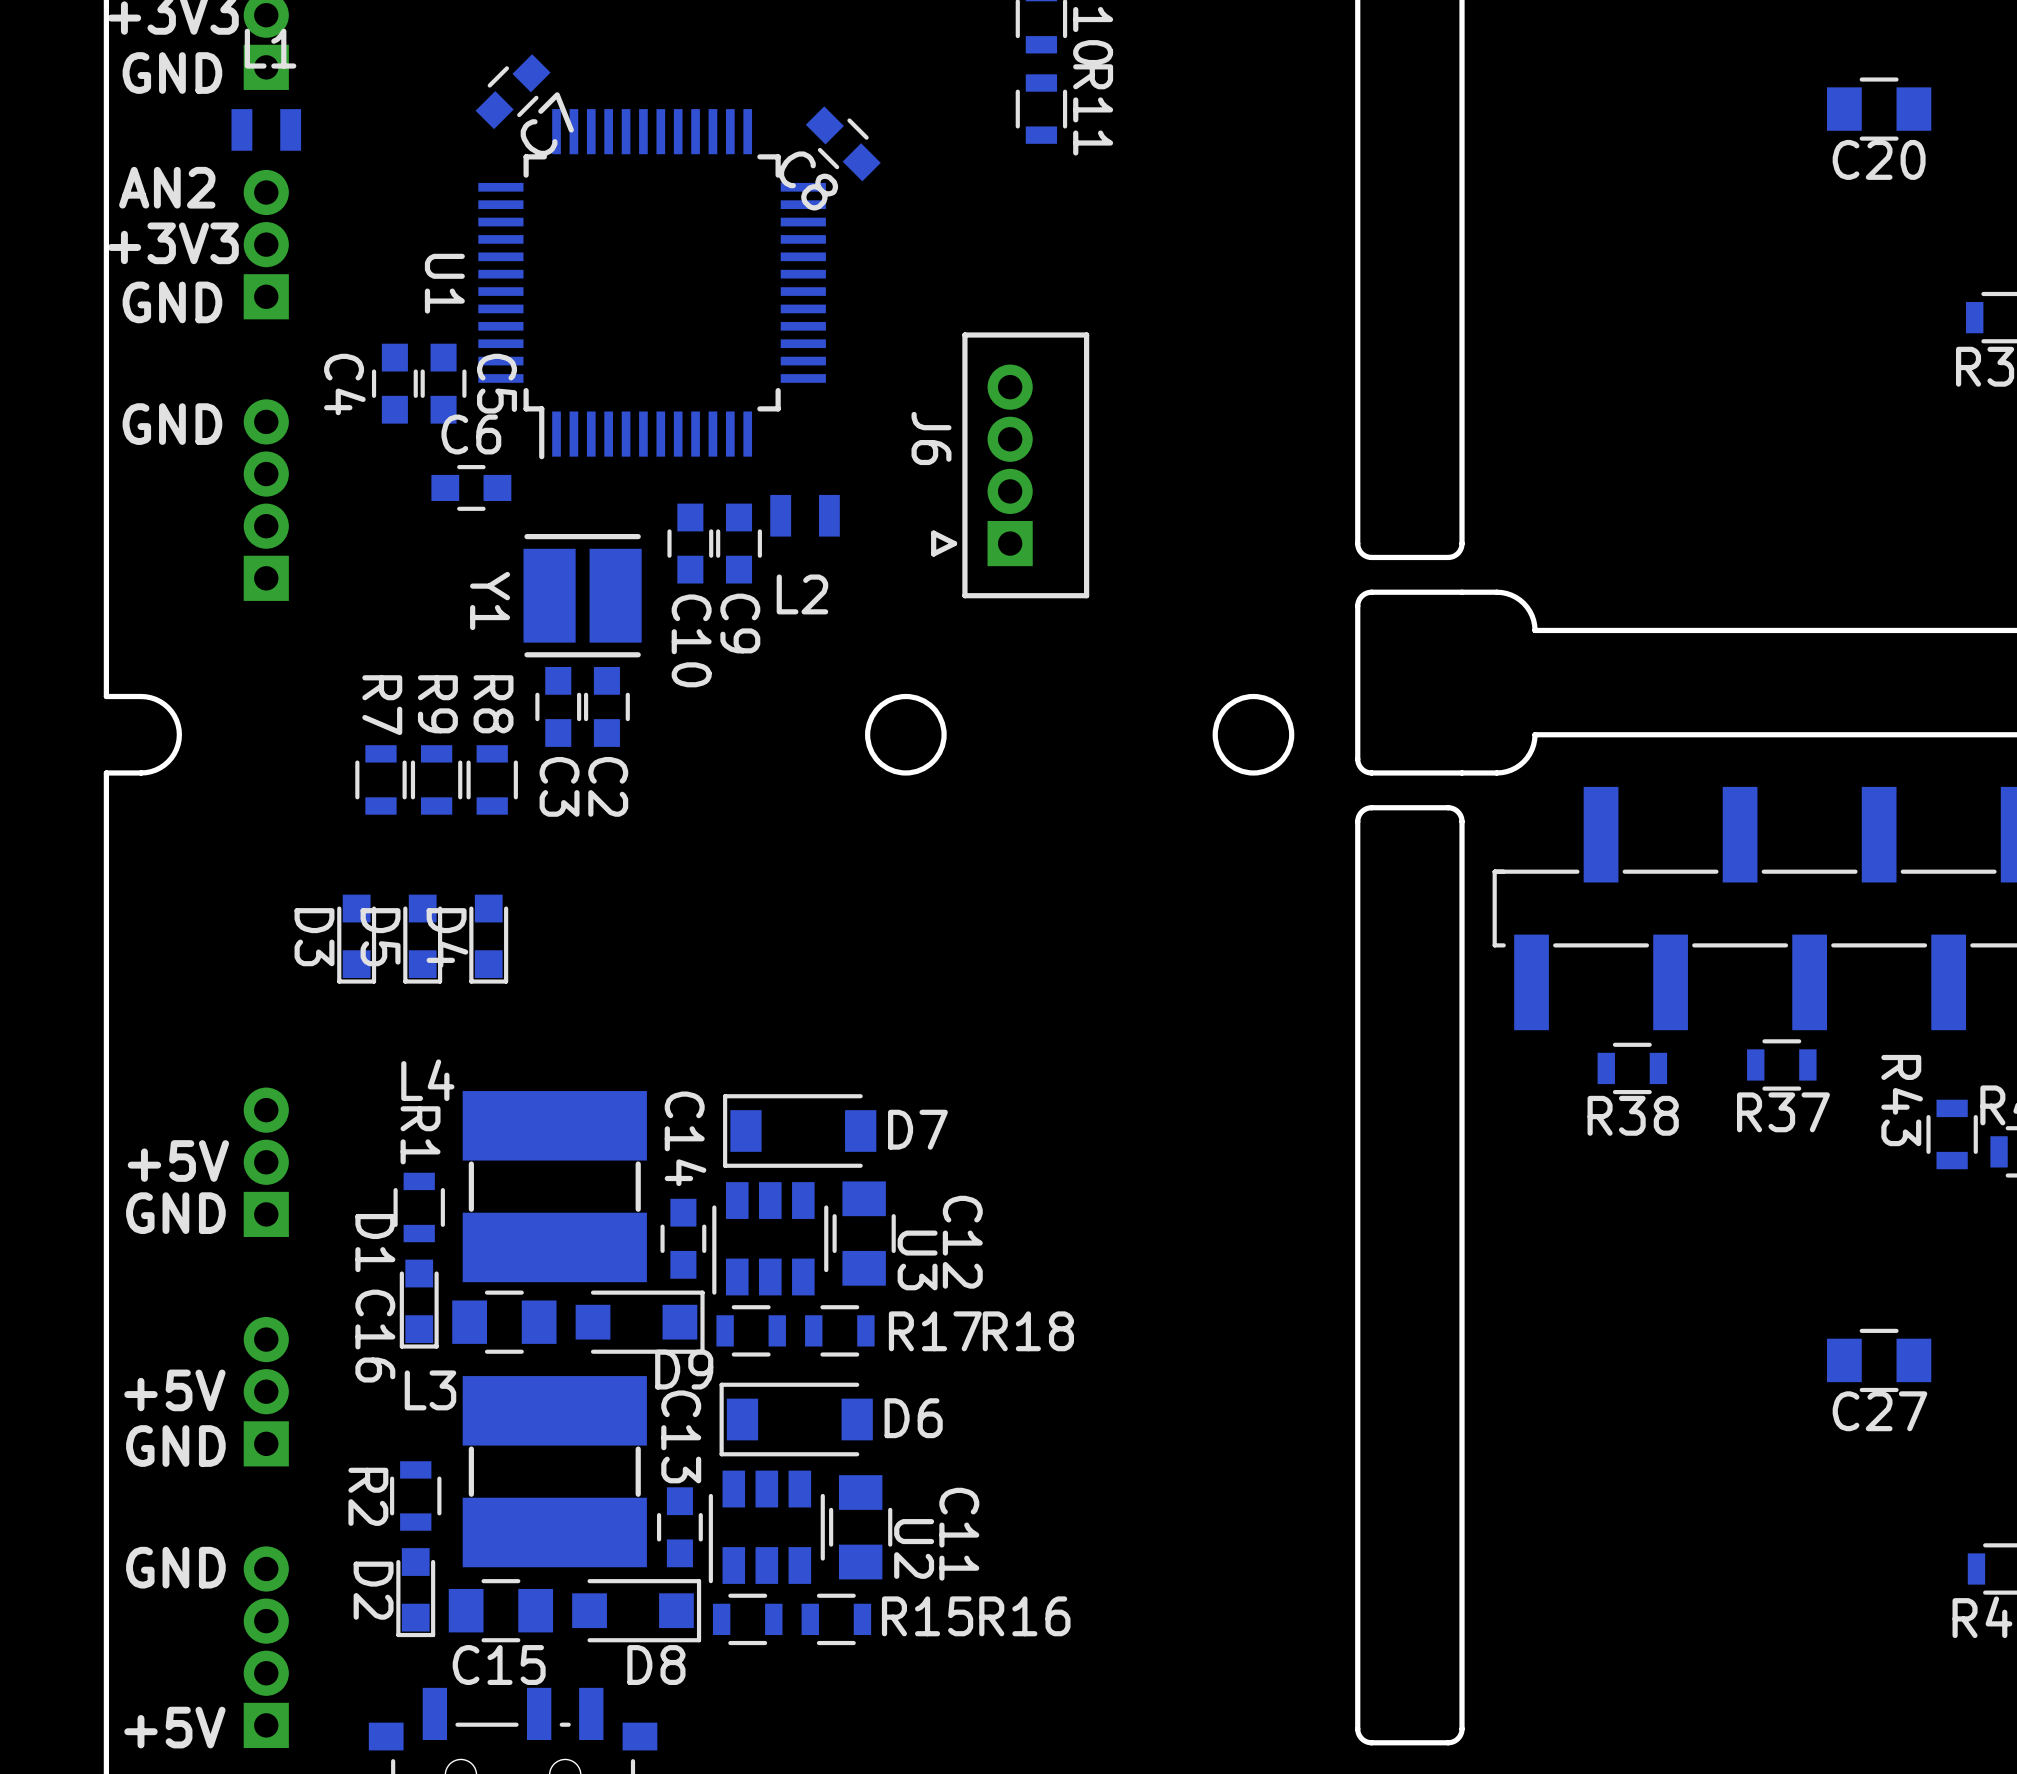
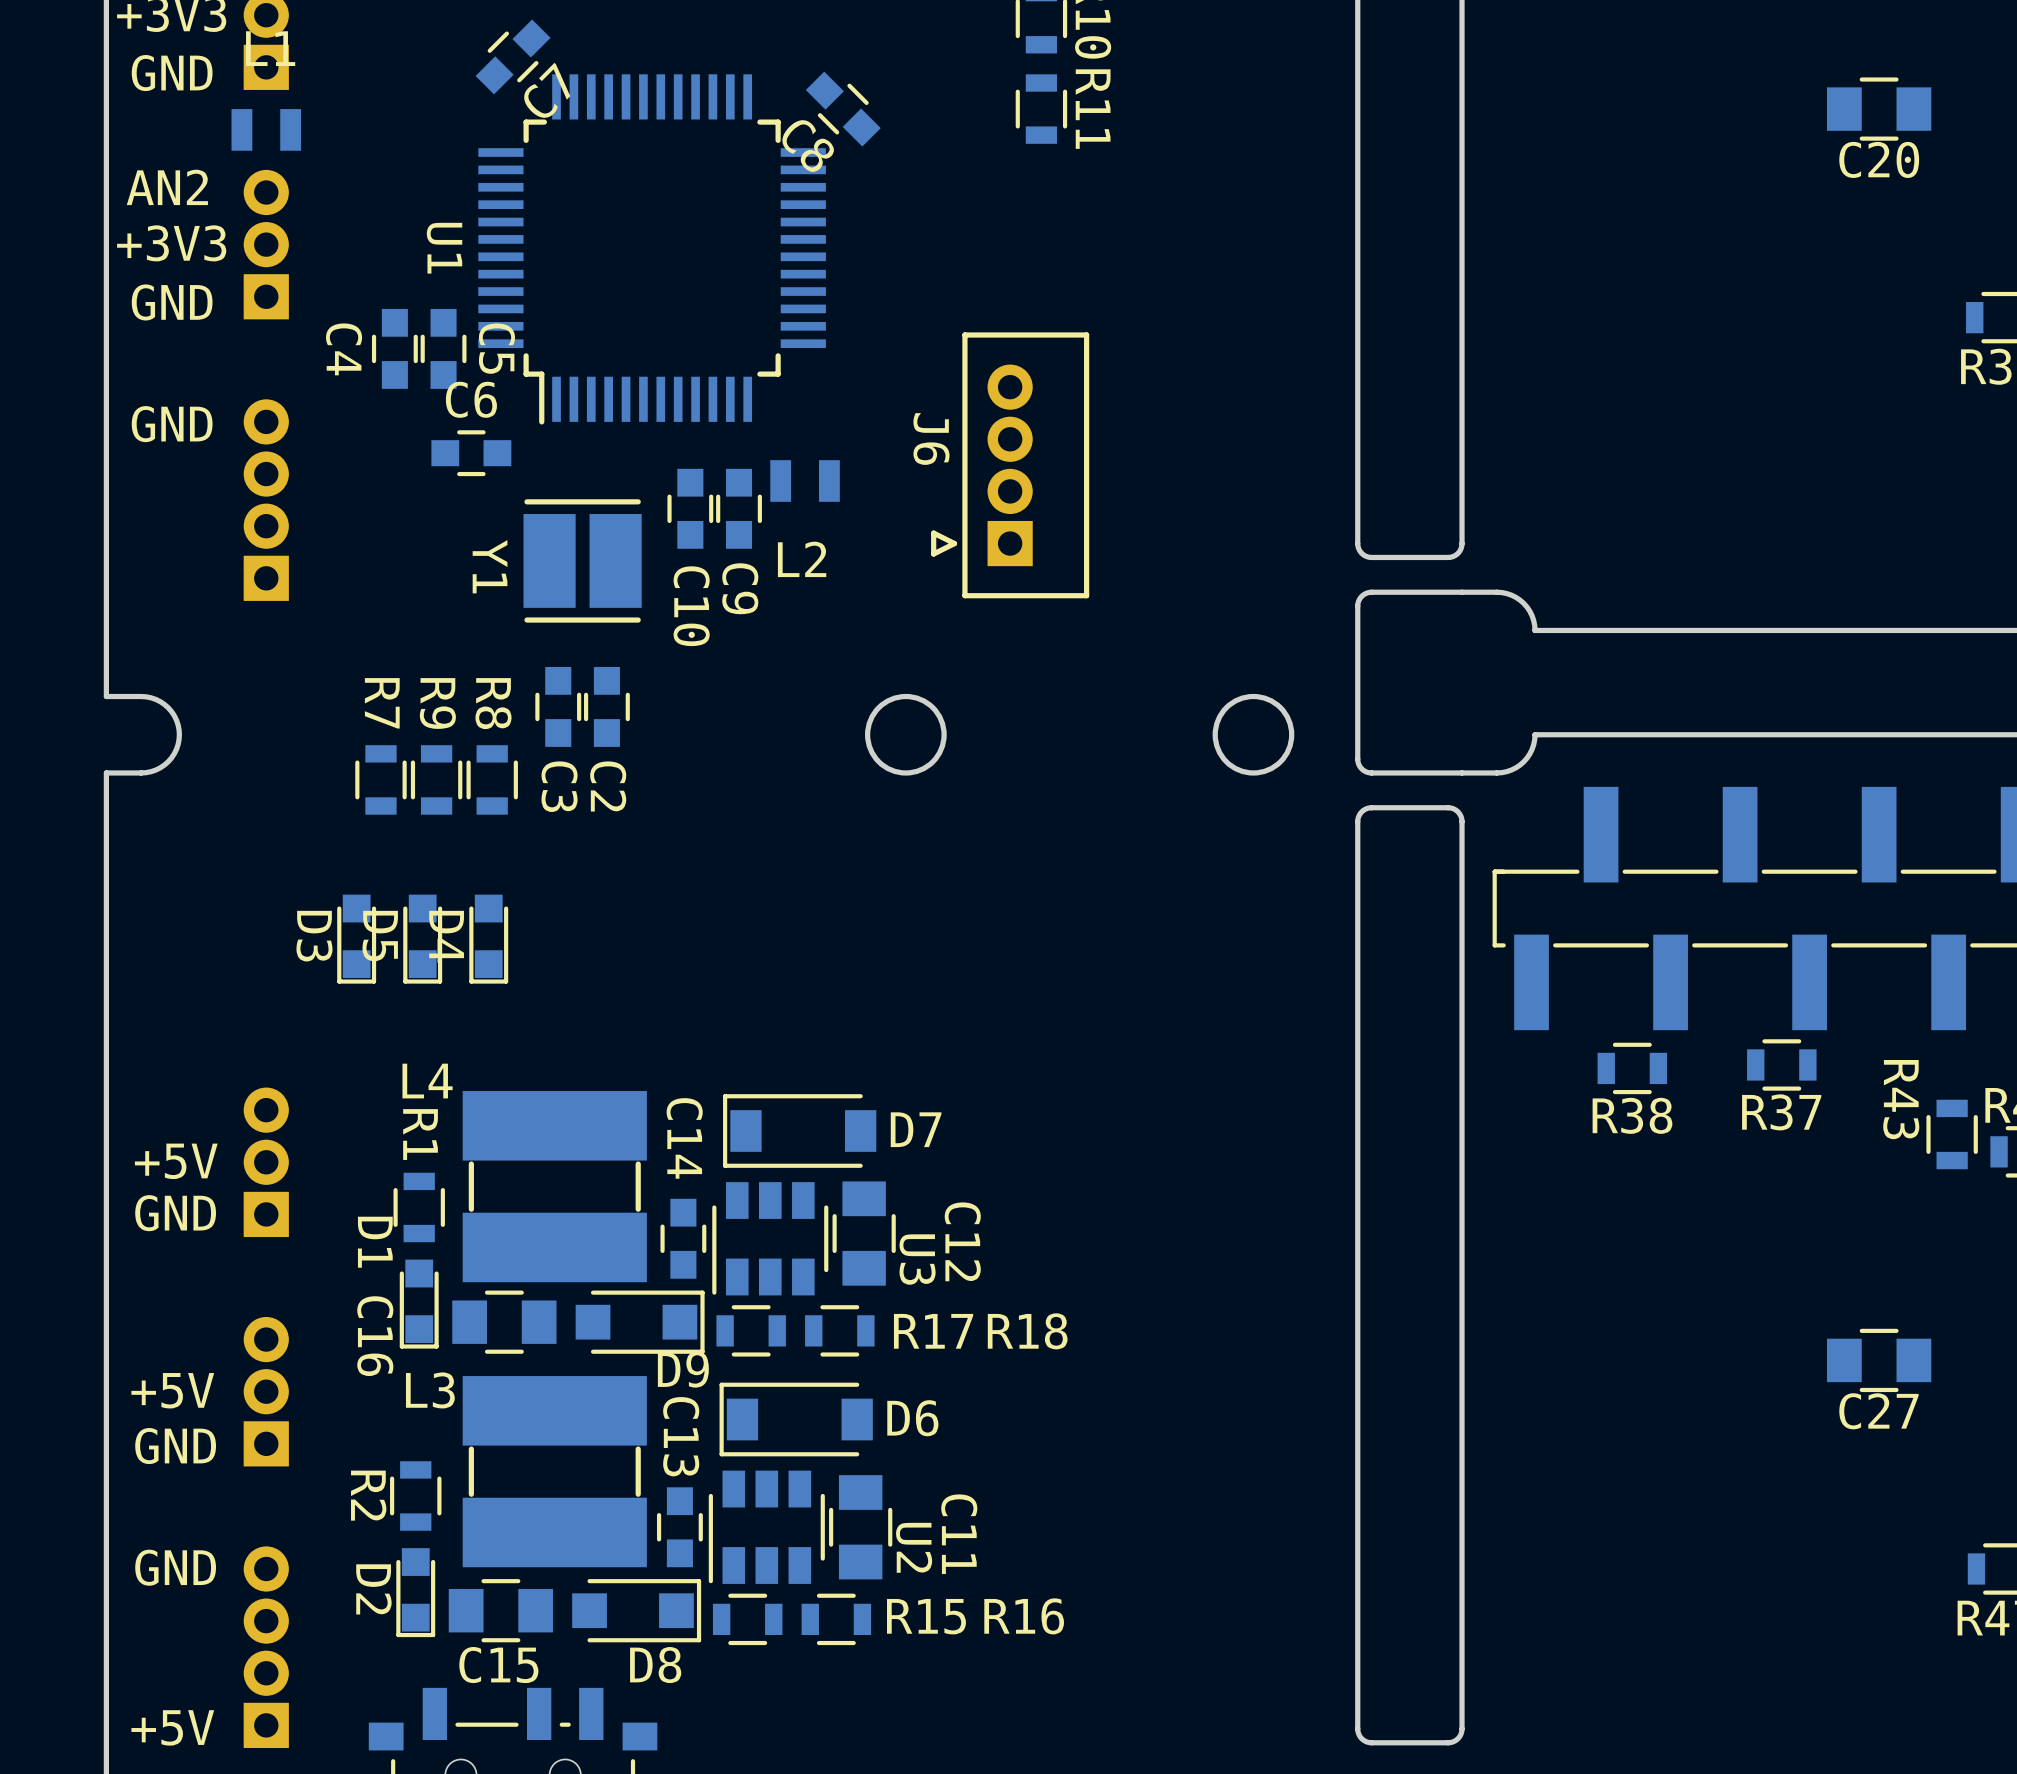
C7 position: (513, 91) -> (513, 56)
C8 position: (843, 143) -> (843, 109)
U1 position: (652, 284) -> (652, 249)
C4 position: (394, 383) -> (394, 348)
C5 position: (443, 383) -> (443, 348)
C6 position: (471, 487) -> (471, 453)
L2 position: (805, 515) -> (805, 480)
C10 position: (690, 543) -> (690, 508)
C9 position: (739, 543) -> (739, 508)
Y1 position: (582, 595) -> (582, 560)

